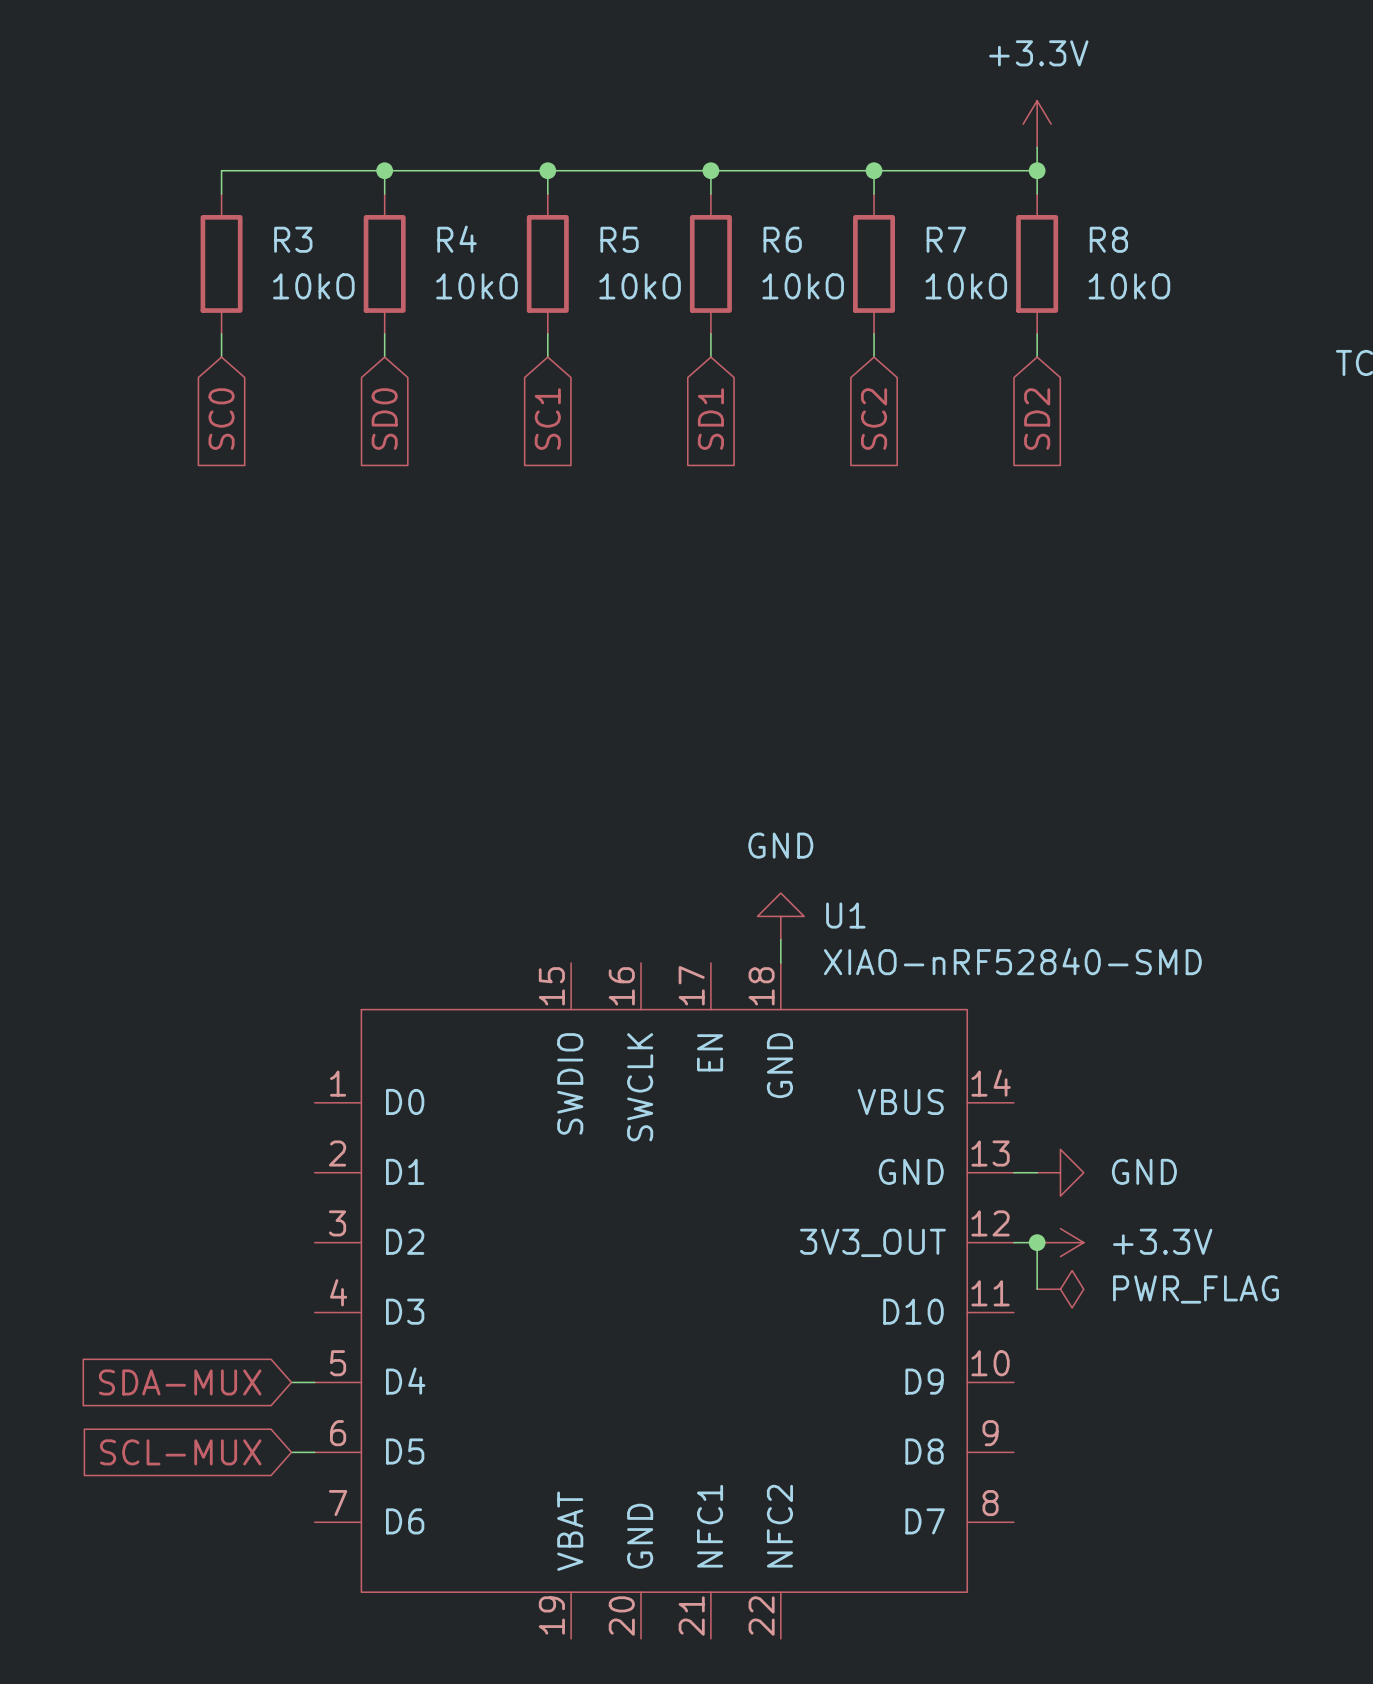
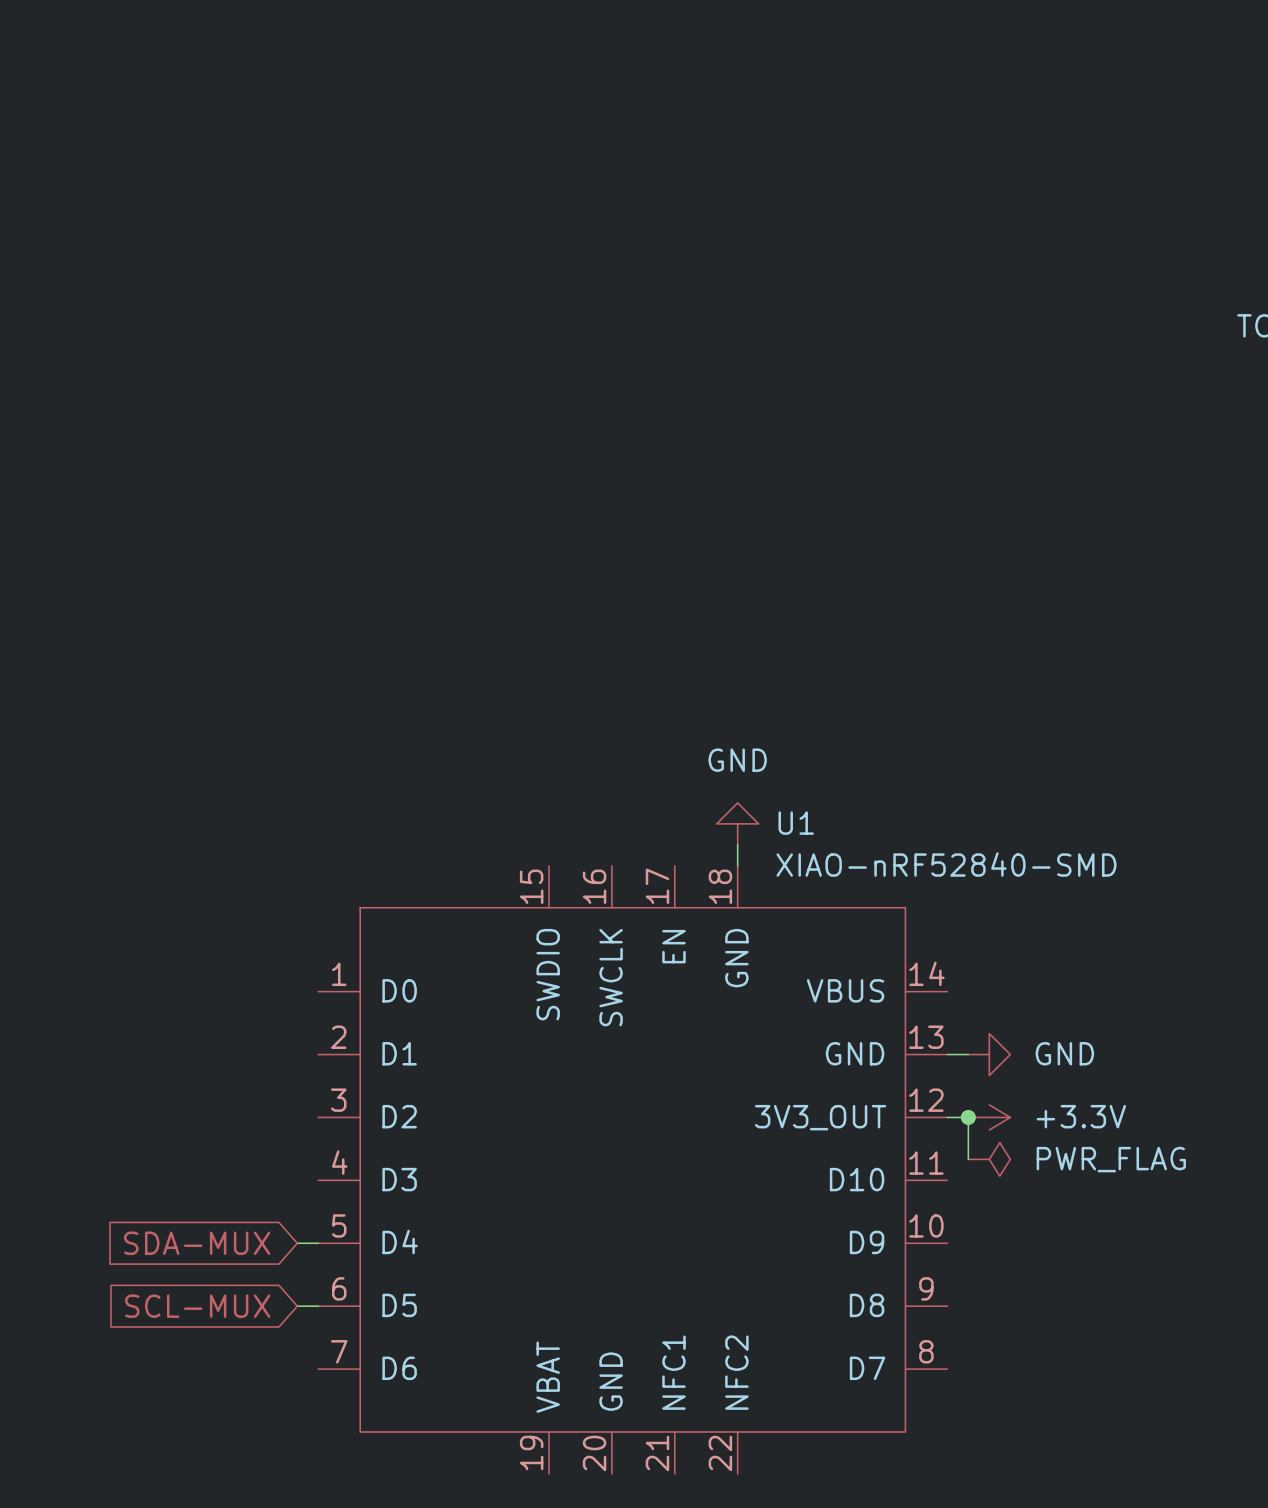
power symbol: +3.3V (1037, 124) -> none
wire: (1037, 147) (1037, 194) -> none
wire: (384, 170) (384, 194) -> none
junction: (384, 170) -> none
wire: (547, 170) (547, 194) -> none
junction: (547, 170) -> none
wire: (710, 170) (710, 194) -> none
junction: (710, 170) -> none
wire: (874, 170) (874, 194) -> none
junction: (874, 170) -> none
wire: (1037, 170) (221, 170) (221, 194) -> none
junction: (1037, 170) -> none
R3: 10kO (221, 263) -> none
R4: 10kO (384, 263) -> none
R5: 10kO (547, 263) -> none
R6: 10kO (710, 263) -> none
R7: 10kO (874, 263) -> none
R8: 10kO (1037, 263) -> none
wire: (221, 333) (221, 357) -> none
wire: (384, 333) (384, 357) -> none
wire: (547, 333) (547, 357) -> none
wire: (710, 333) (710, 357) -> none
wire: (874, 333) (874, 357) -> none
wire: (1037, 333) (1037, 357) -> none
global label: SC0 (221, 419) -> none
global label: SD0 (384, 419) -> none
global label: SC1 (547, 419) -> none
global label: SD1 (710, 419) -> none
global label: SC2 (874, 419) -> none
global label: SD2 (1037, 419) -> none

